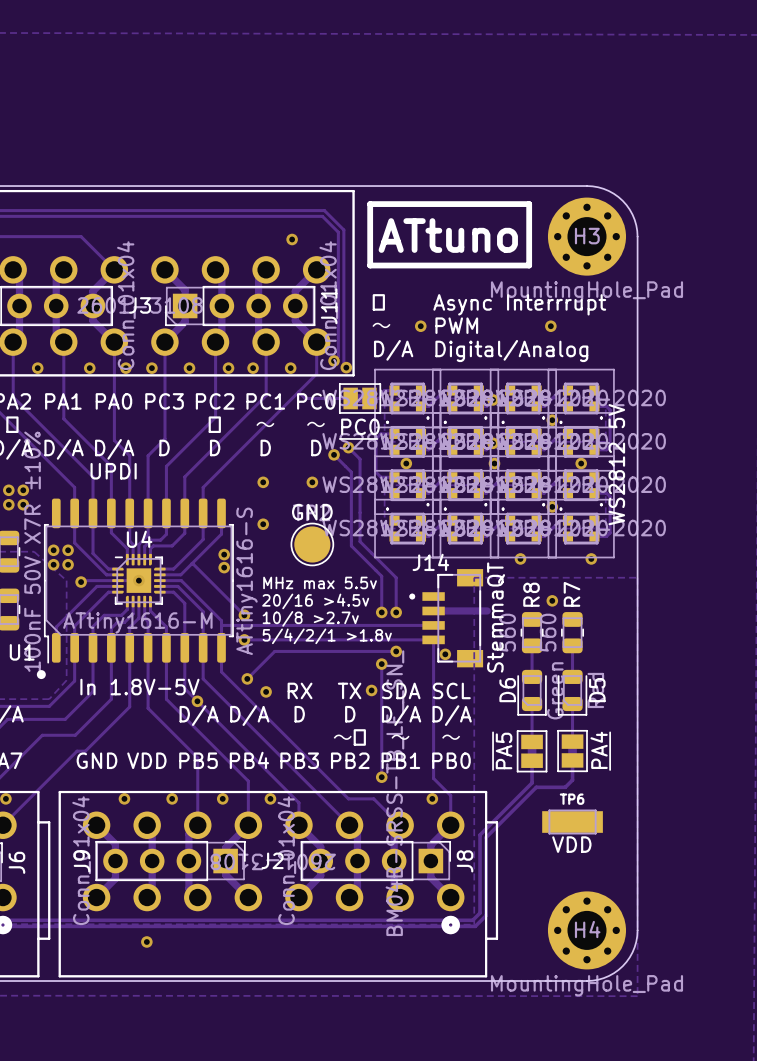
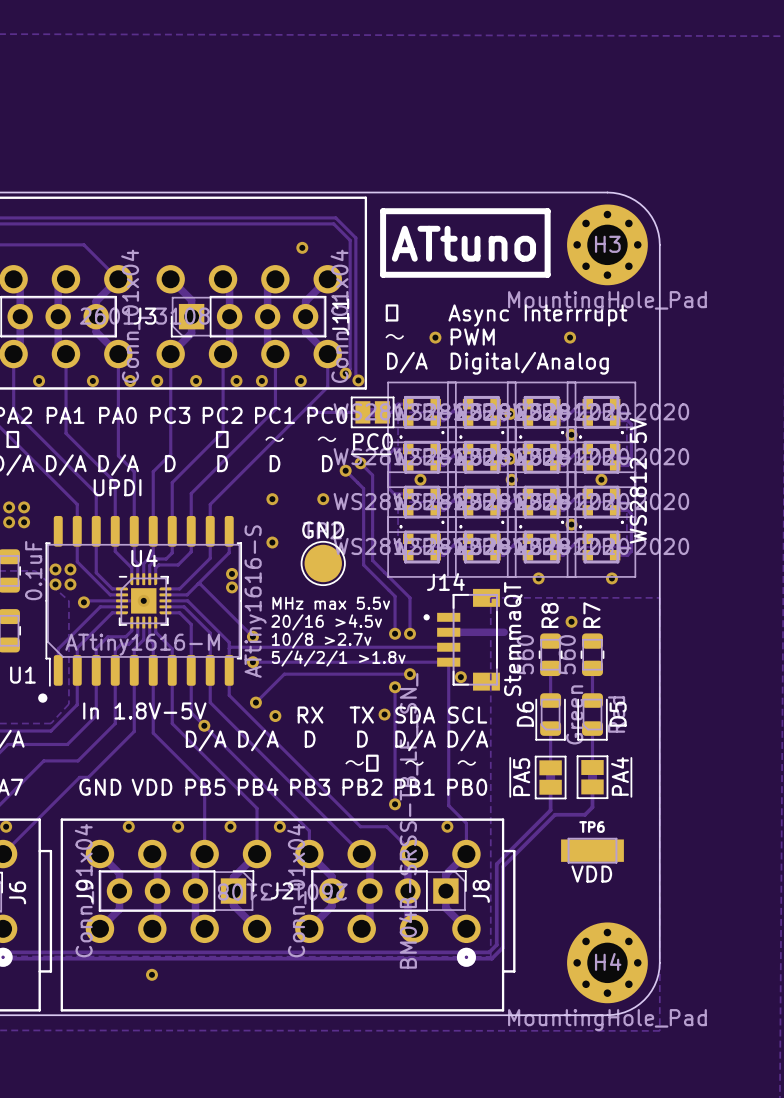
part value: 100nF 50V X7R ±10% (32, 551) -> 0.1uF (33, 570)

